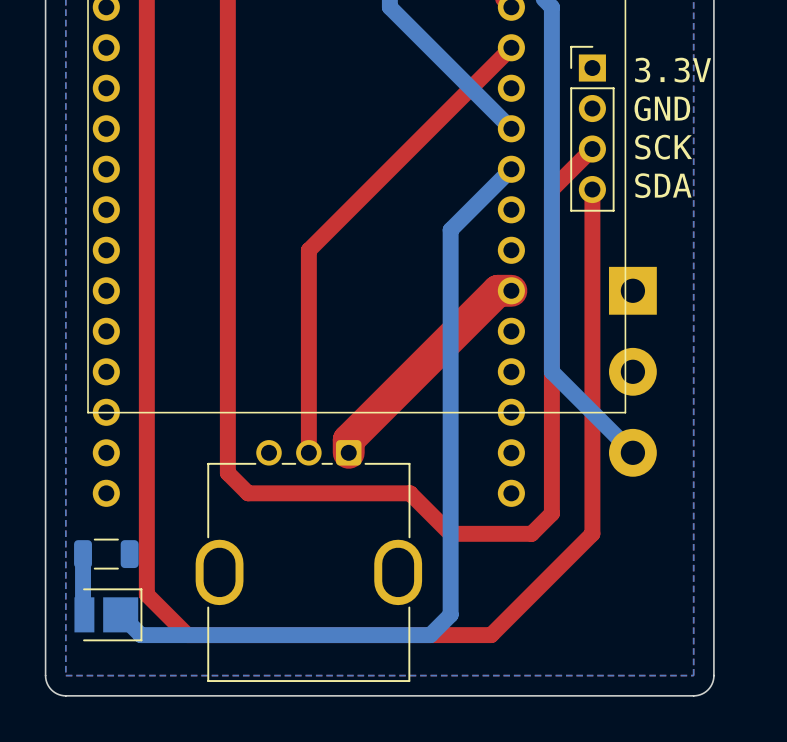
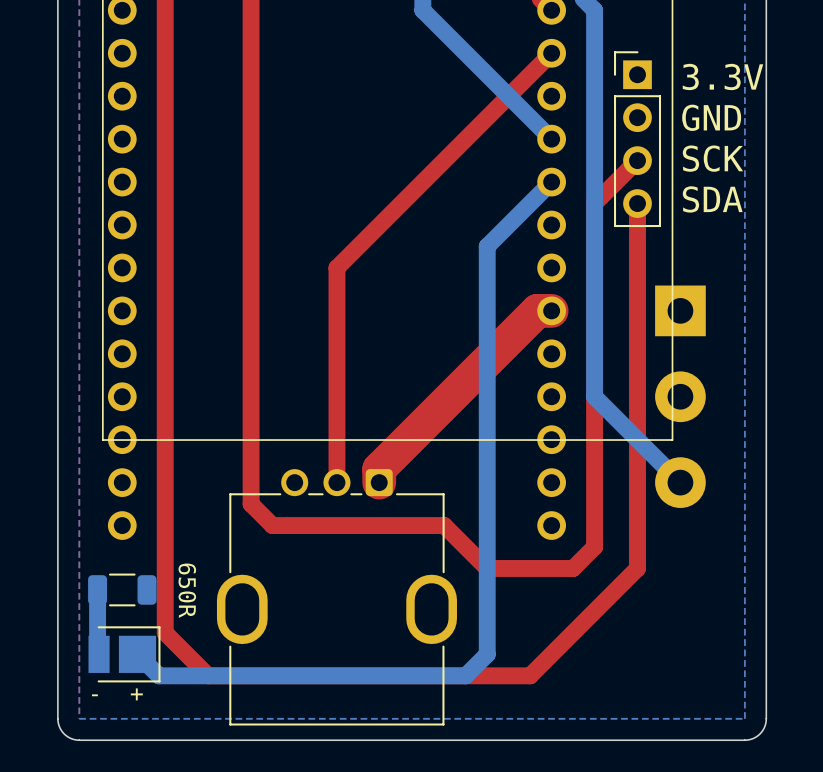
part value: none -> 650R (187, 590)
text: none -> - + (117, 694)

